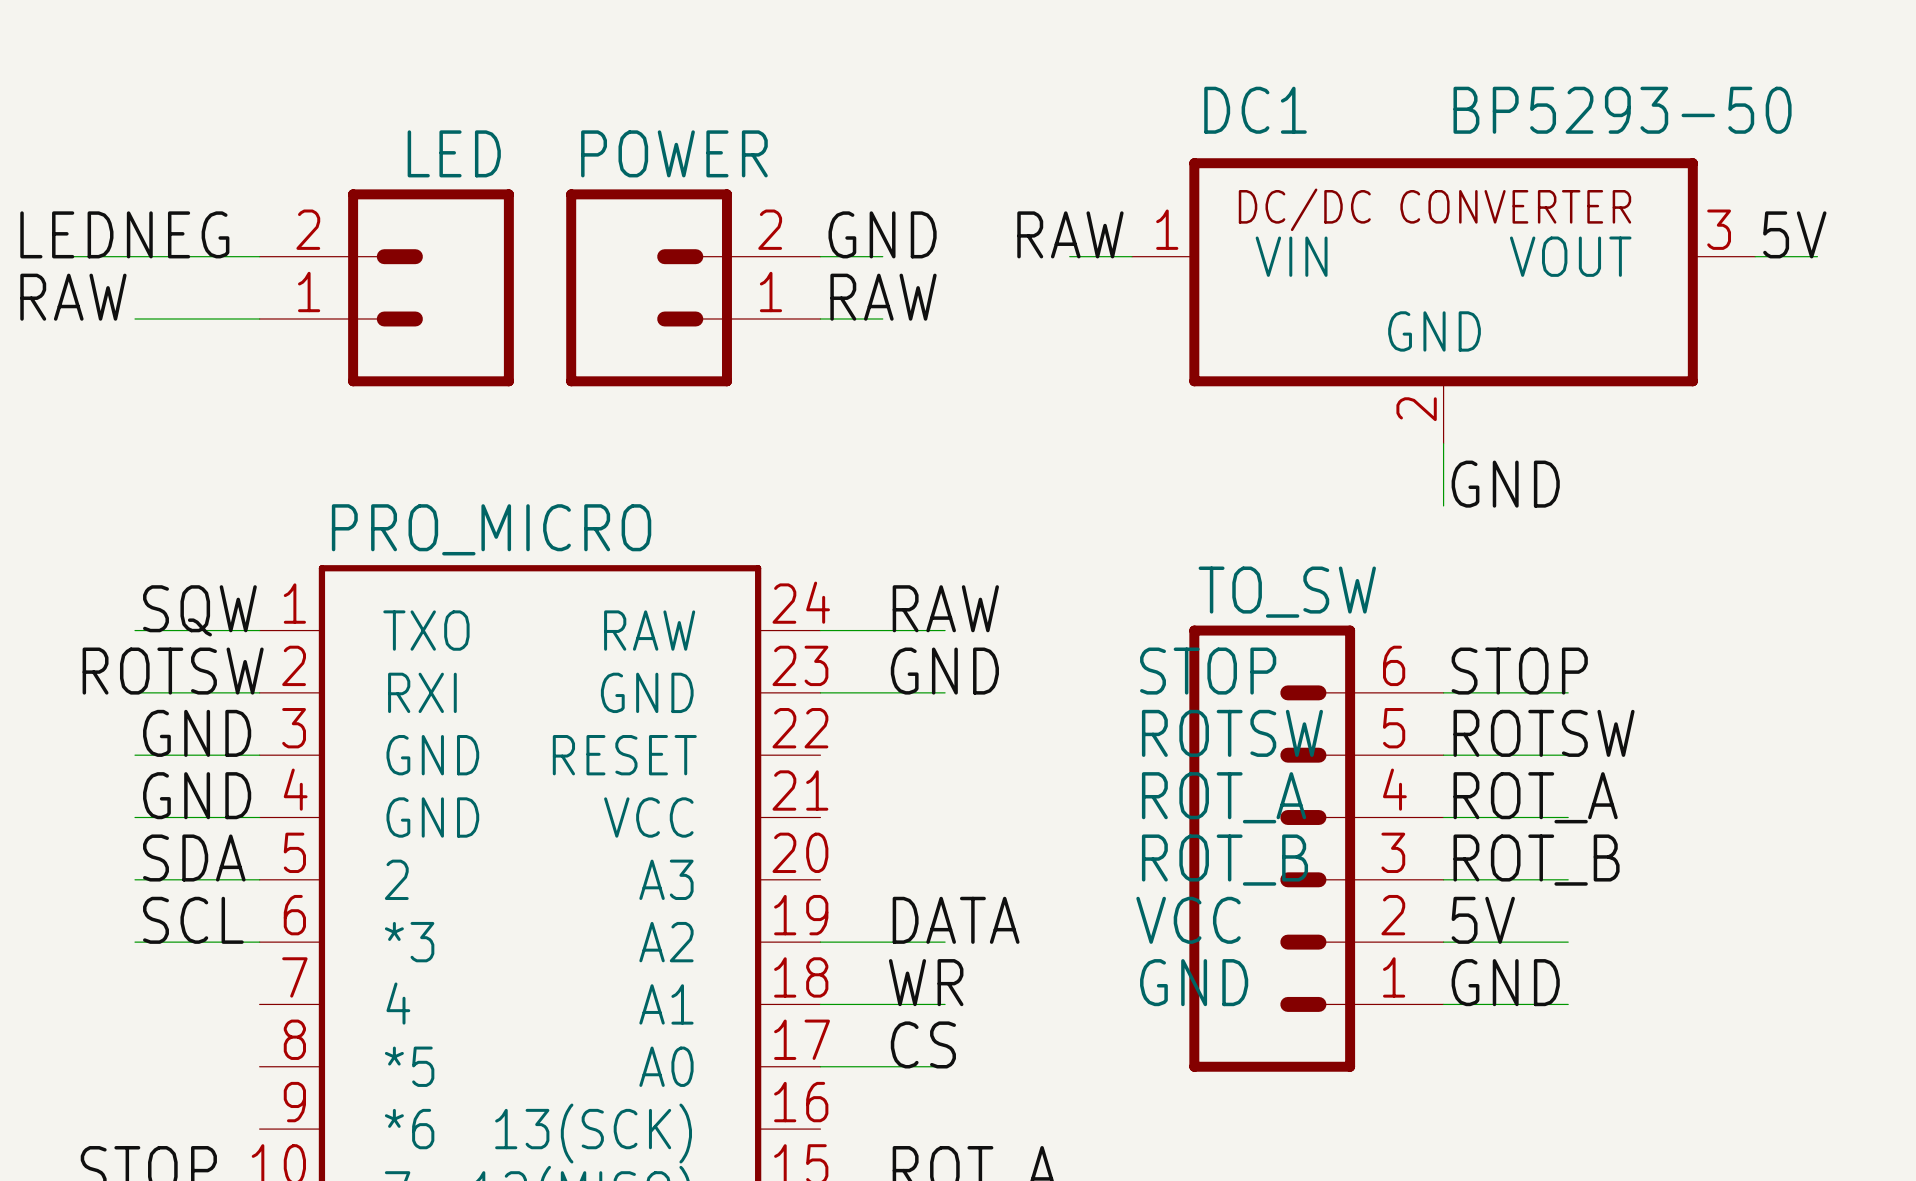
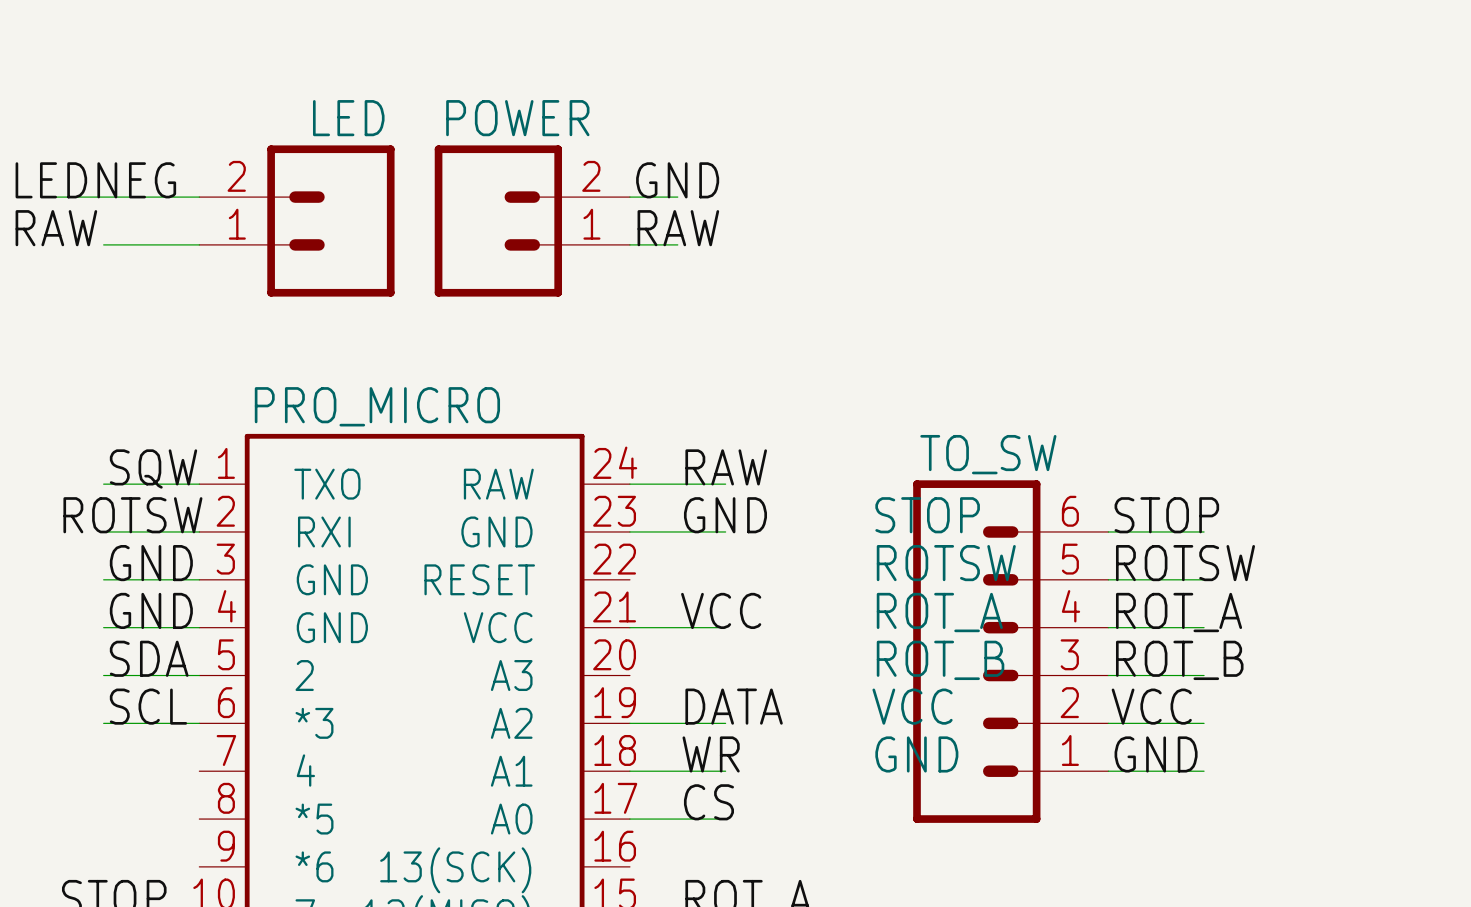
label: RAW (1070, 234) -> none
label: 5V (1794, 234) -> none
wire: (1069, 256) (1132, 256) -> none
wire: (1755, 256) (1817, 256) -> none
DC1: BP5293-50 (1443, 300) -> none
wire: (1443, 443) (1443, 505) -> none
label: GND (1505, 484) -> none
label: none -> VCC (721, 610)
wire: none -> (629, 627) (725, 627)
label: 5V (1483, 920) -> VCC (1151, 706)

